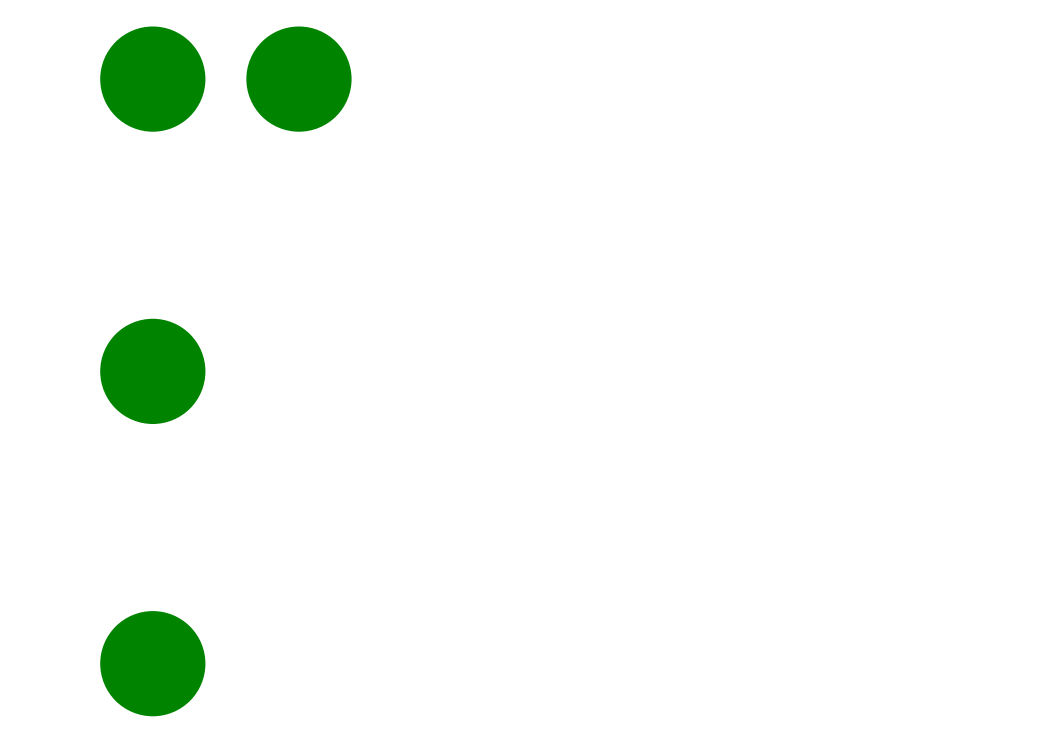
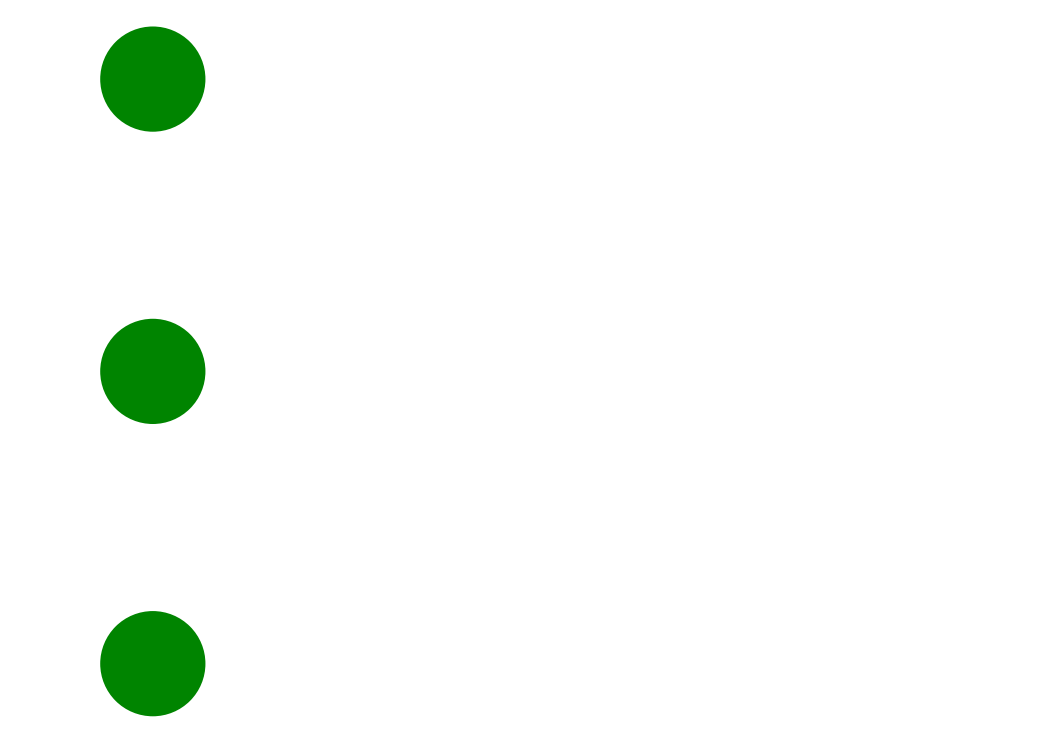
junction: (298, 79) -> none

